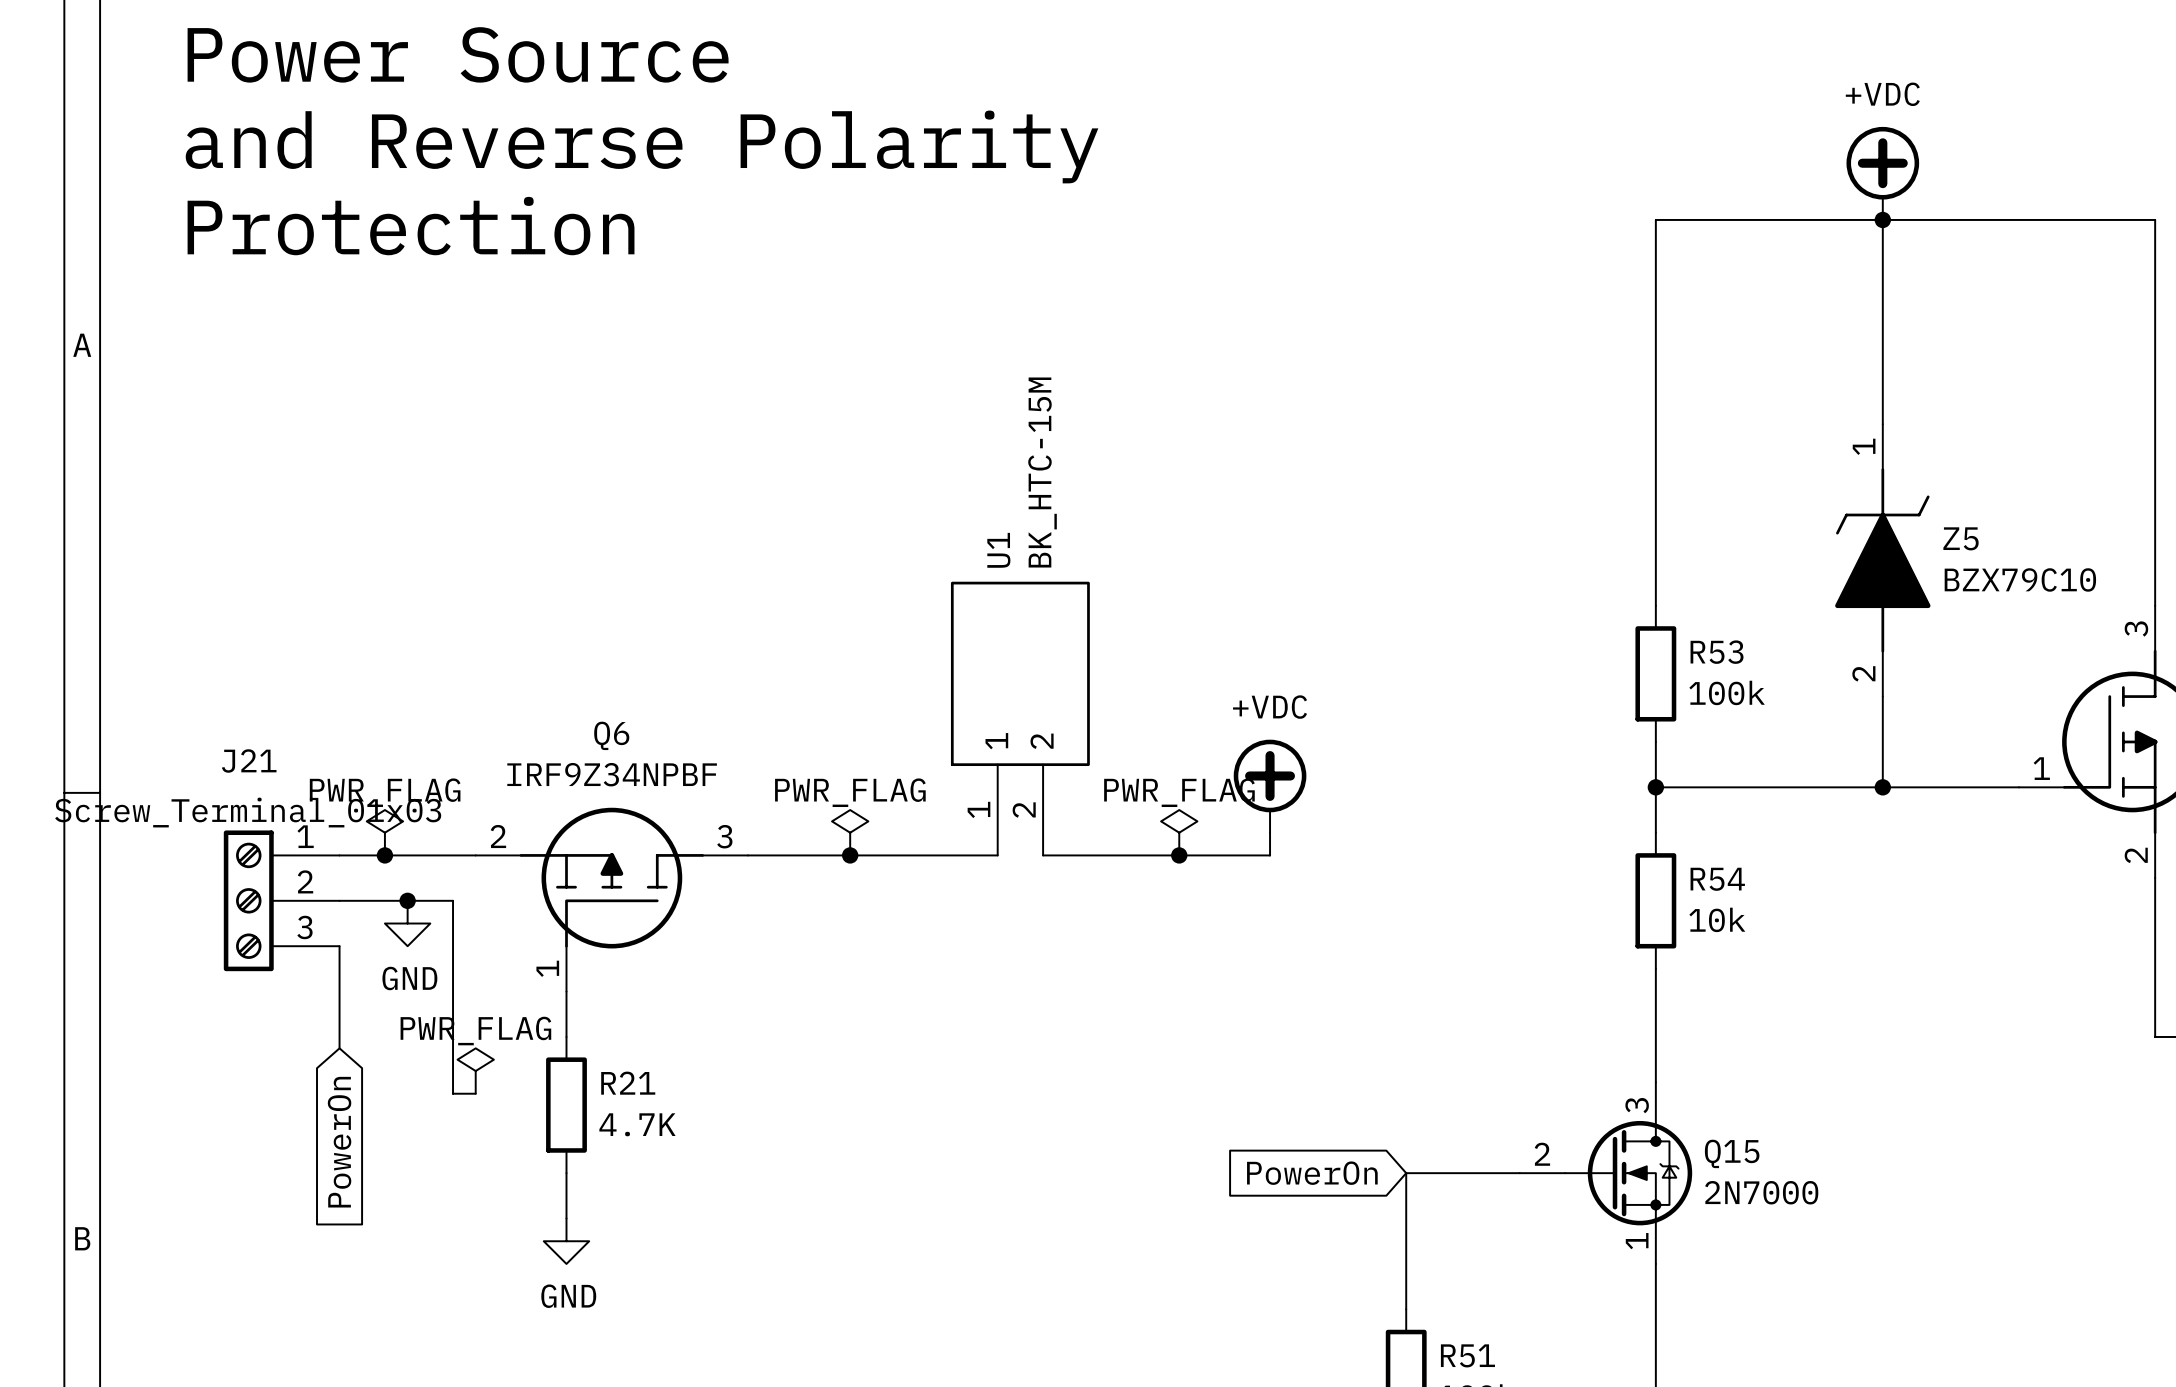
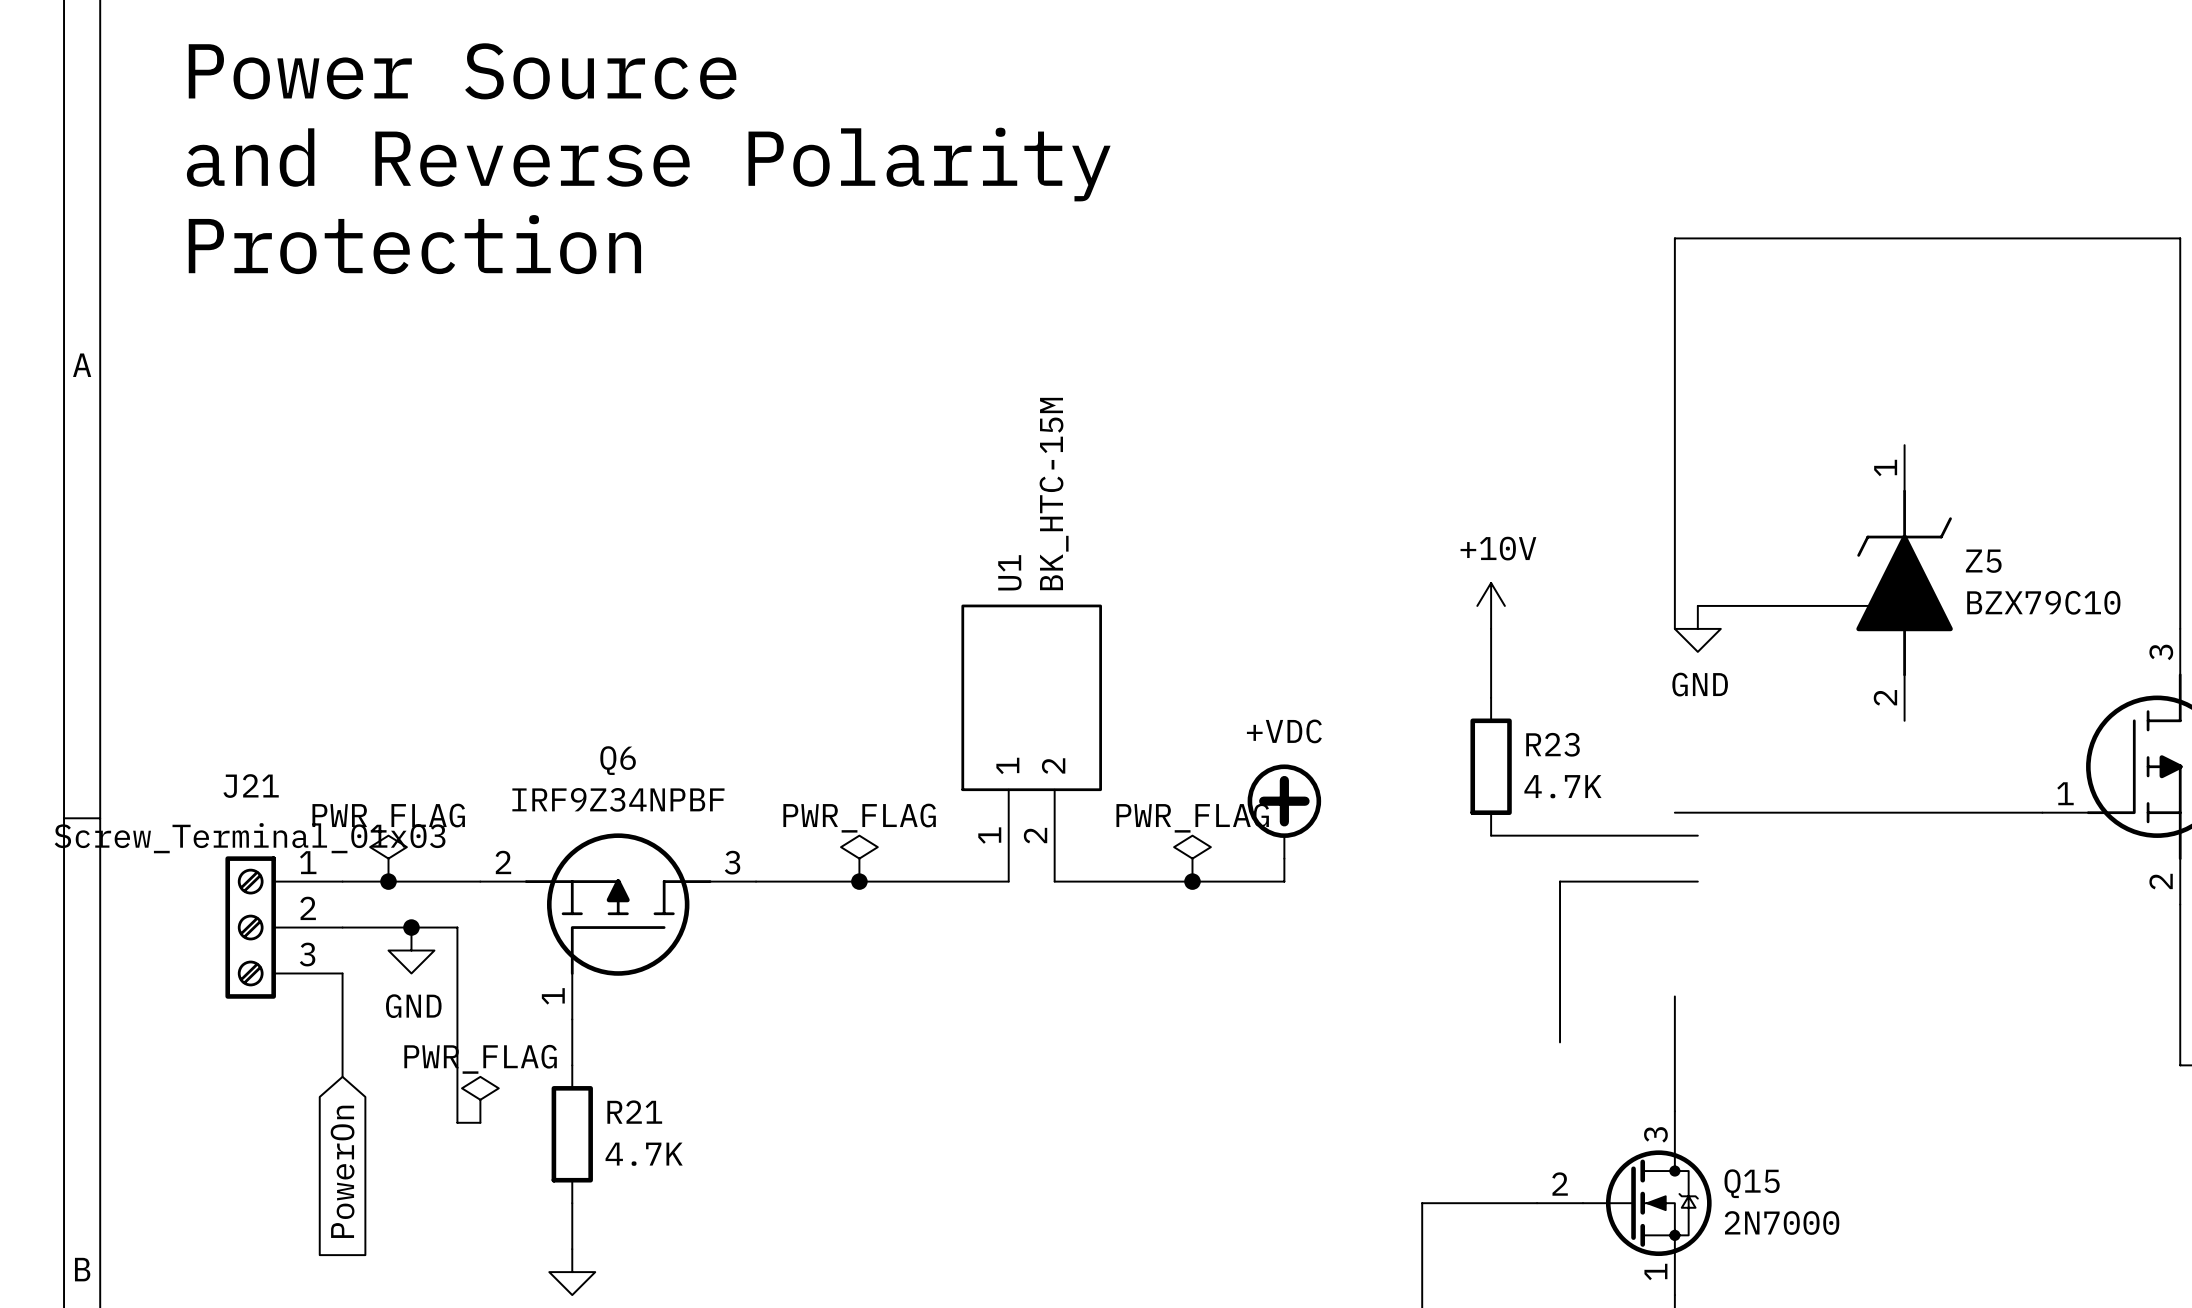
power symbol: +VDC (1882, 173) -> none
wire: (1882, 219) (1882, 424) -> none
junction: (1882, 219) -> none
power symbol: none -> +10V (1491, 605)
wire: none -> (1697, 605) (1904, 605)
wire: none -> (1491, 628) (1491, 697)
power symbol: none -> GND (1697, 628)
R53: 100k (1655, 673) -> none
wire: (1882, 696) (1882, 787) -> none
R23: none -> 4.7K (1491, 766)
wire: (1655, 741) (1655, 832) -> none
junction: (1655, 787) -> none
junction: (1882, 787) -> none
wire: none -> (1491, 835) (1697, 835)
wire: none -> (1697, 881) (1560, 881) (1560, 1042)
R54: 10k (1655, 900) -> none
global label: PowerOn (1312, 1173) -> none

